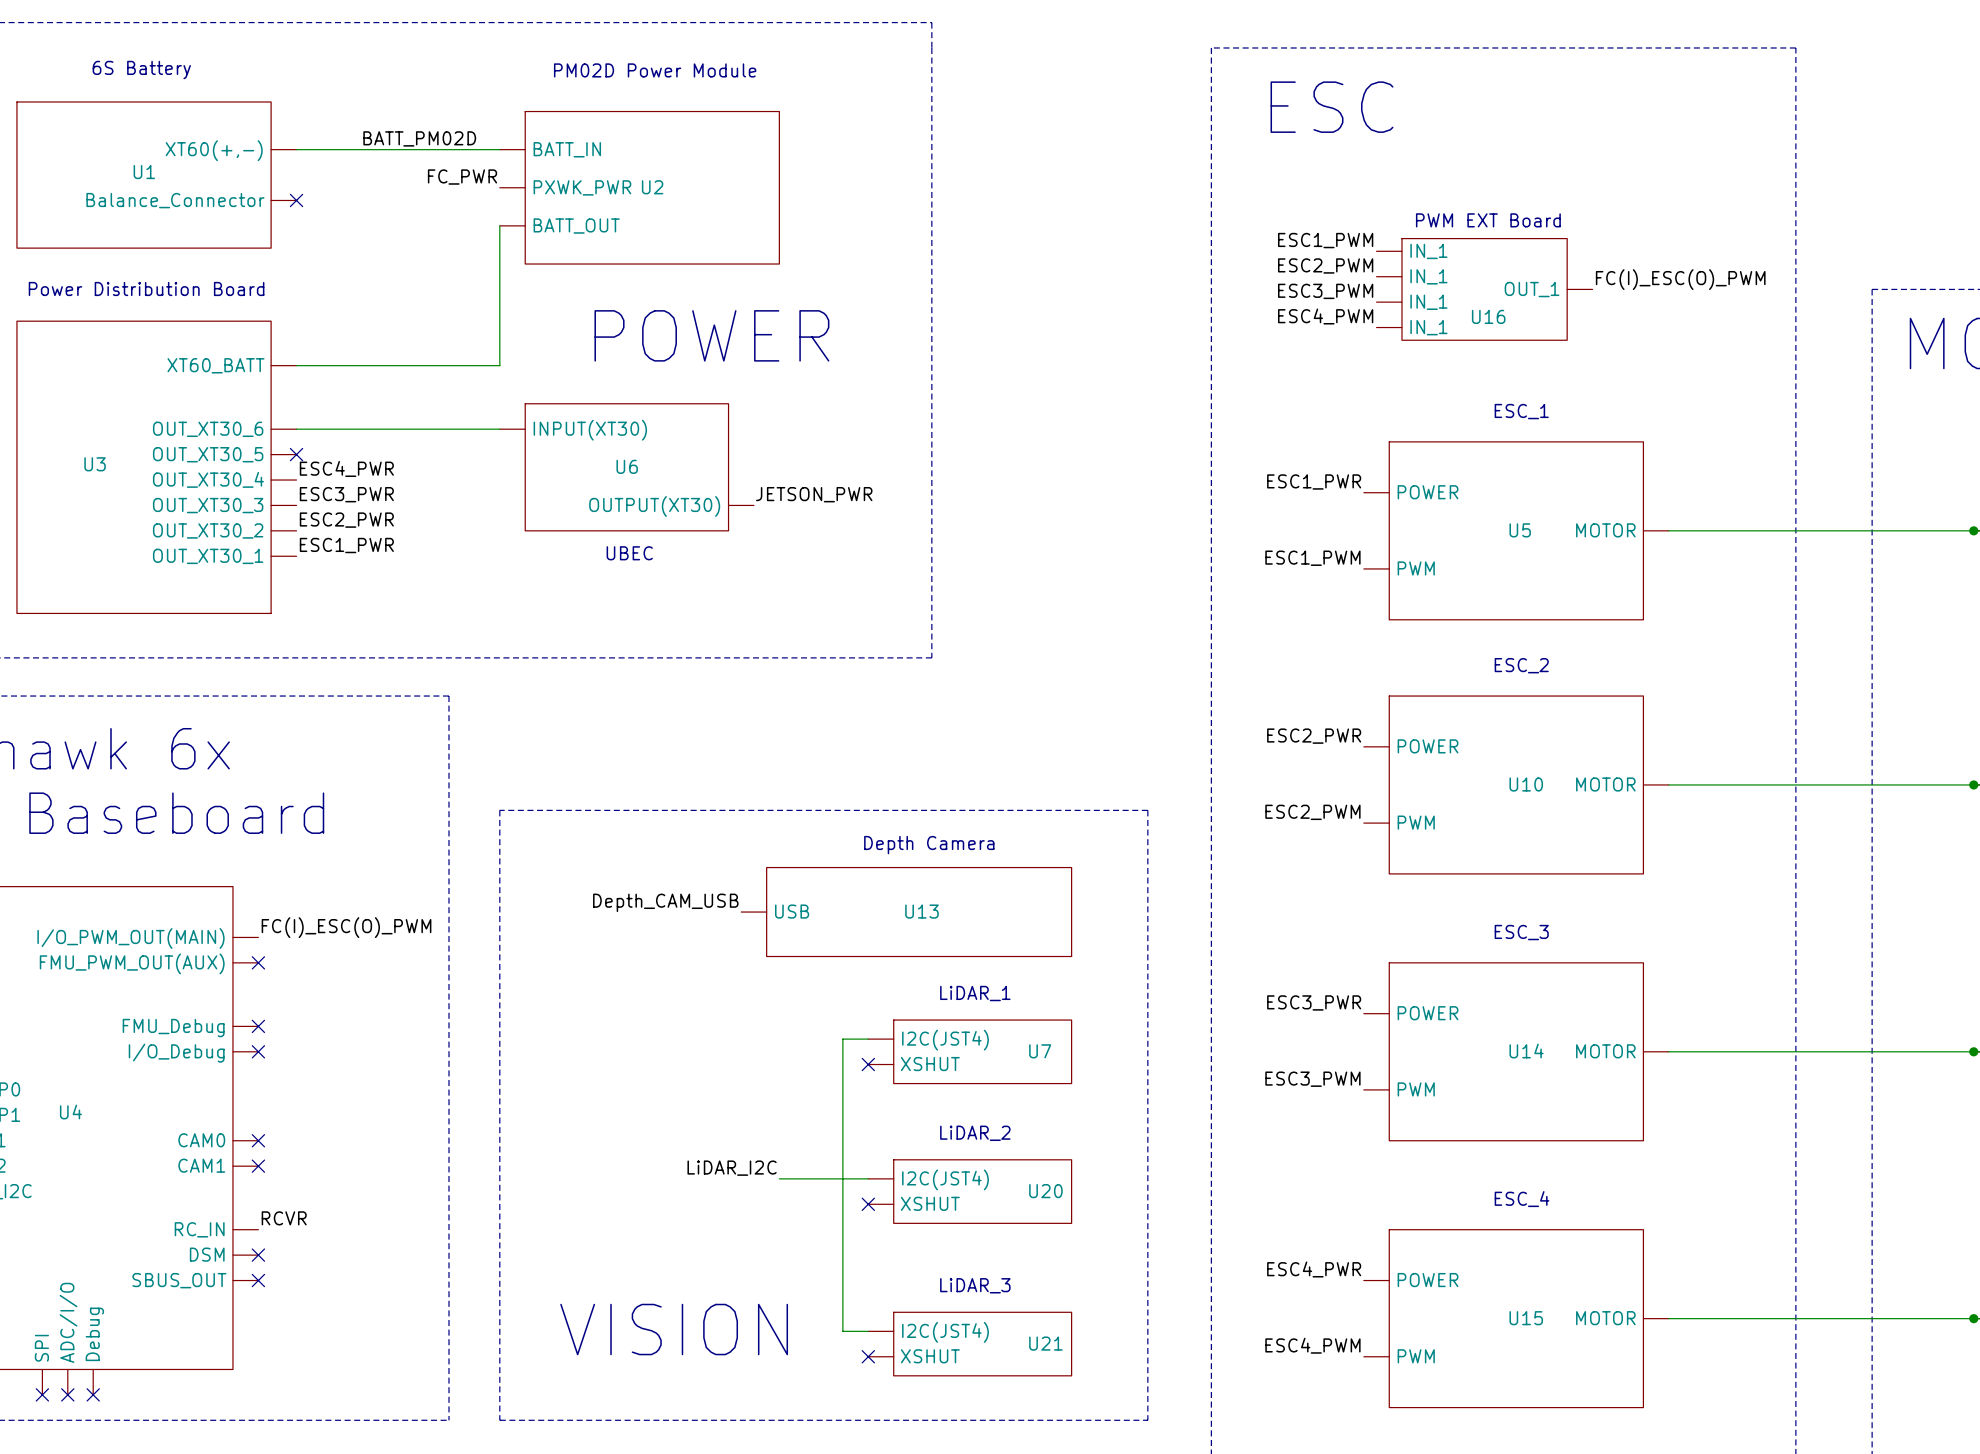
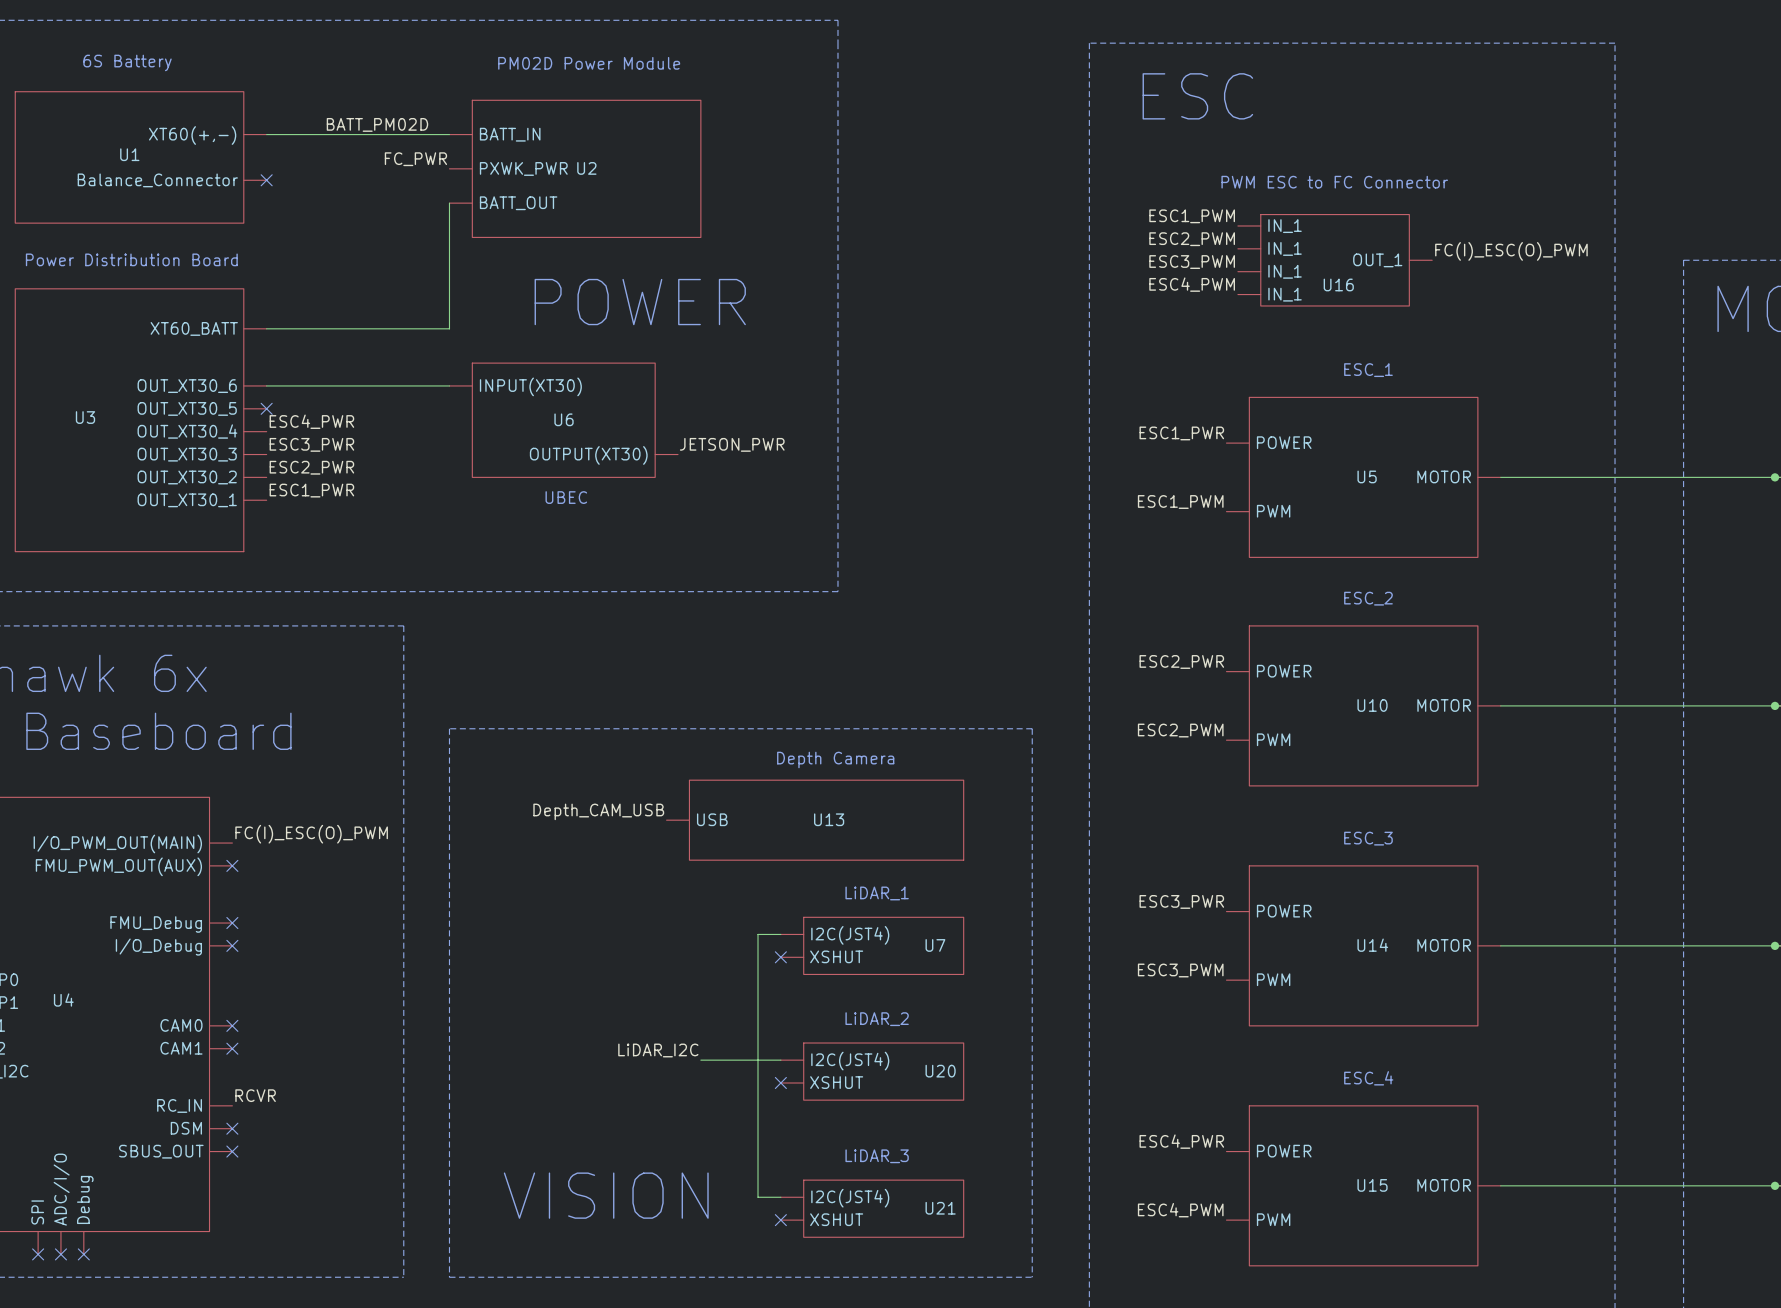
text: none -> PWM ESC to FC Connector (1334, 182)
text: PWM EXT Board (1488, 220) -> none

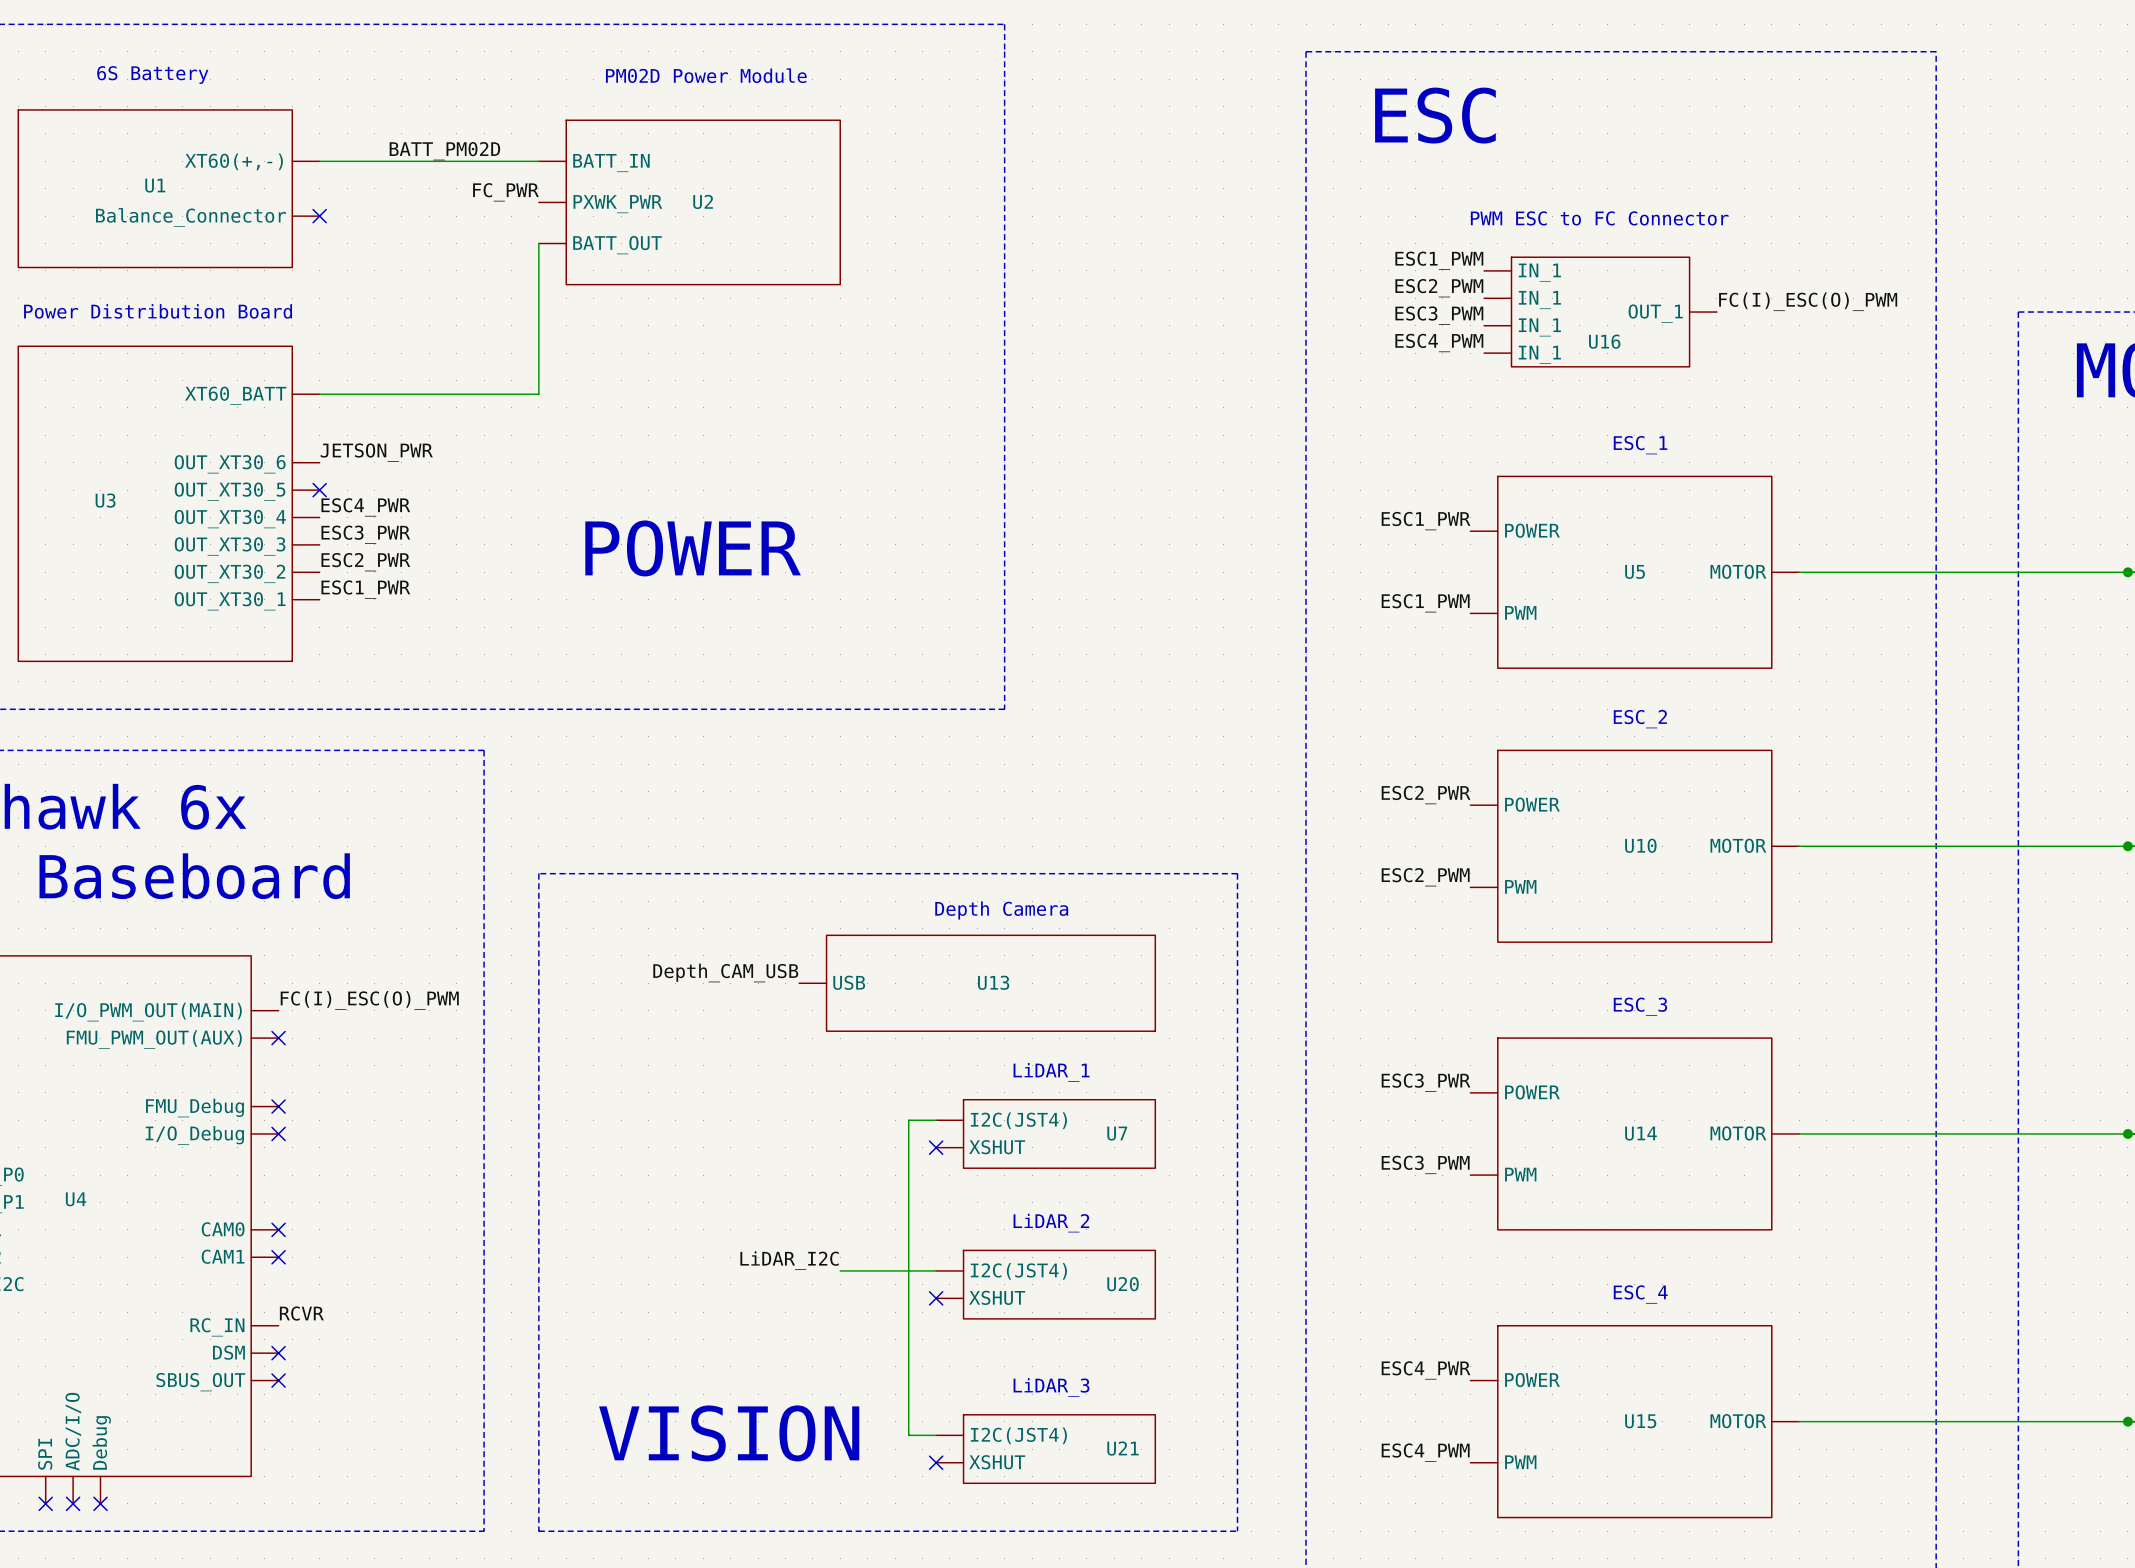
text position: POWER (640, 302) -> POWER (693, 548)
label: none -> JETSON_PWR (376, 452)
wire: (266, 385) (449, 385) -> none
U6: (563, 420) -> none
label: JETSON_PWR (732, 444) -> none
text: UBEC (566, 497) -> none

